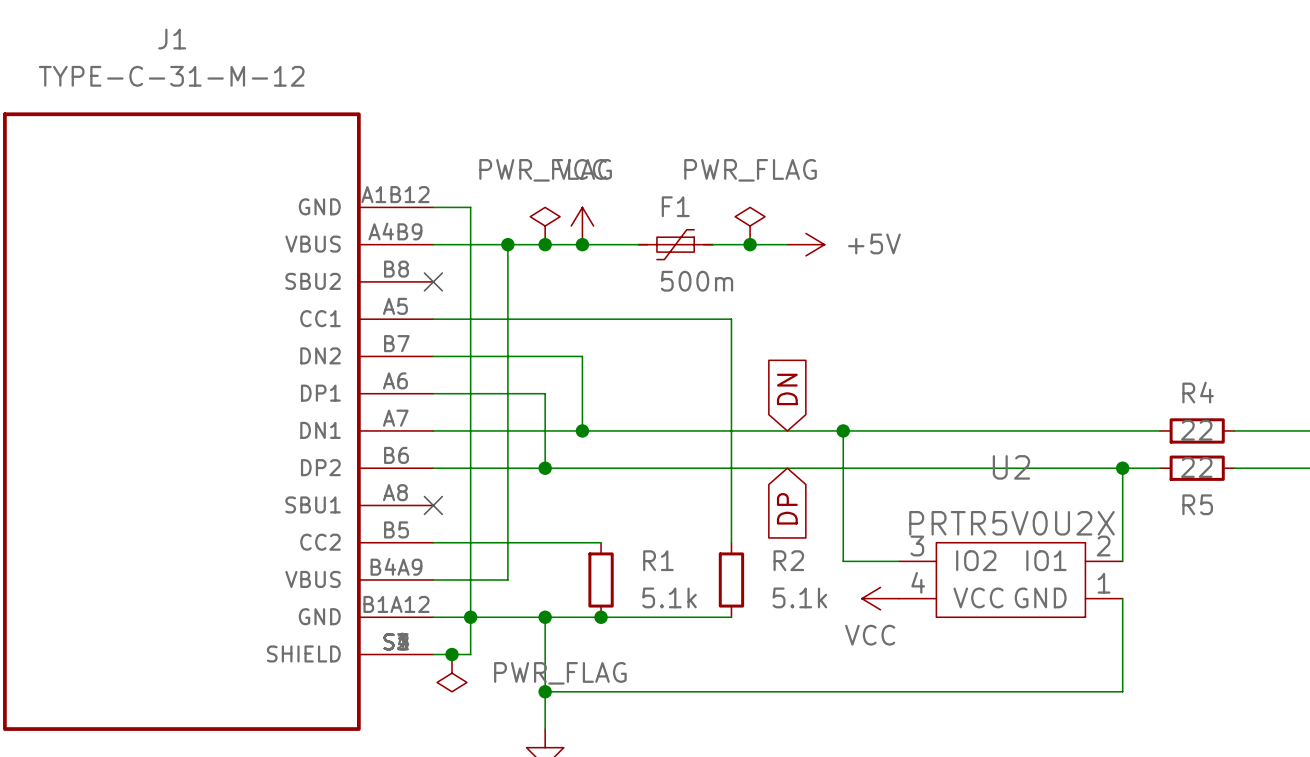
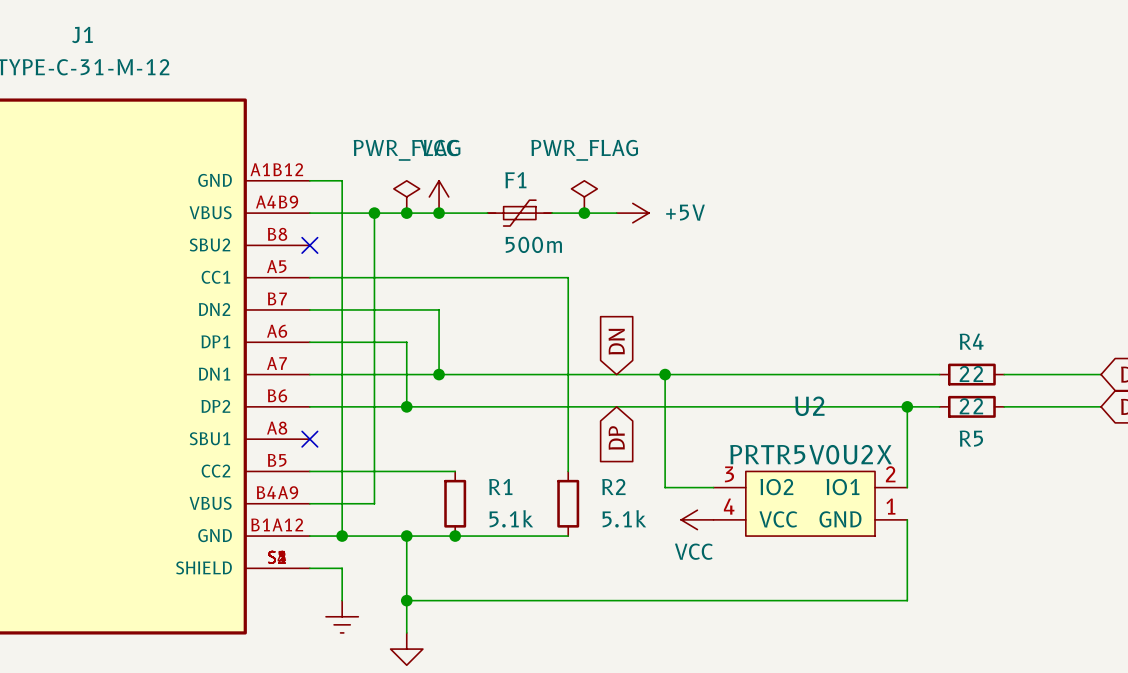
wire: (470, 617) (470, 654) -> (342, 600) (342, 568)
junction: (452, 654) -> none
power symbol: PWR_FLAG (452, 673) -> none
power symbol: none -> (342, 616)

